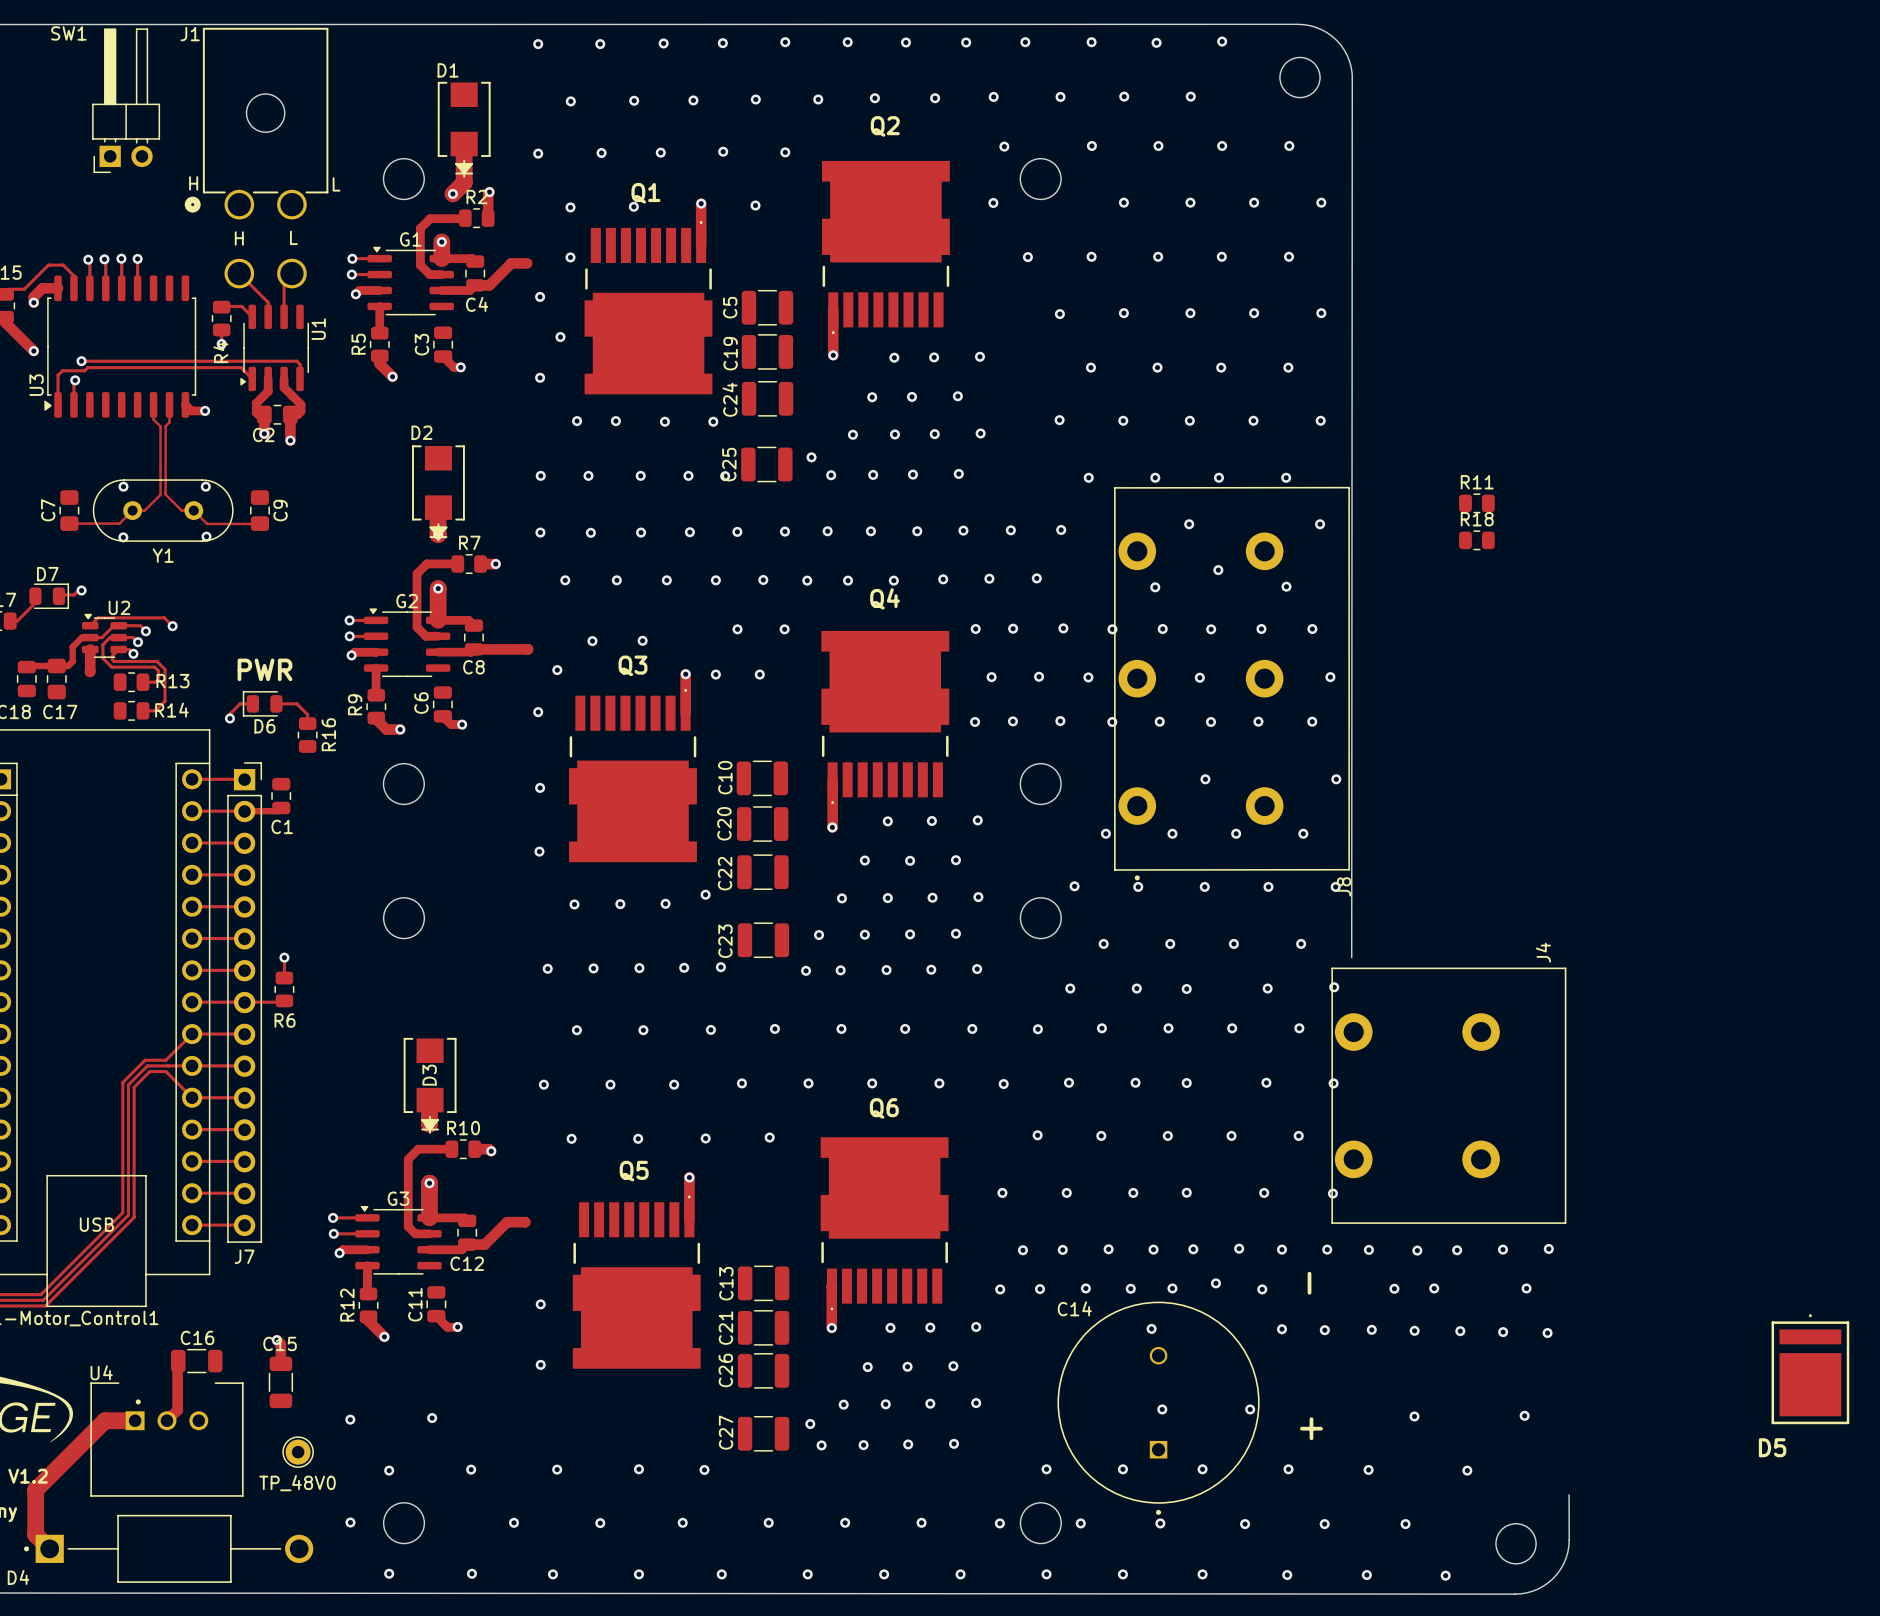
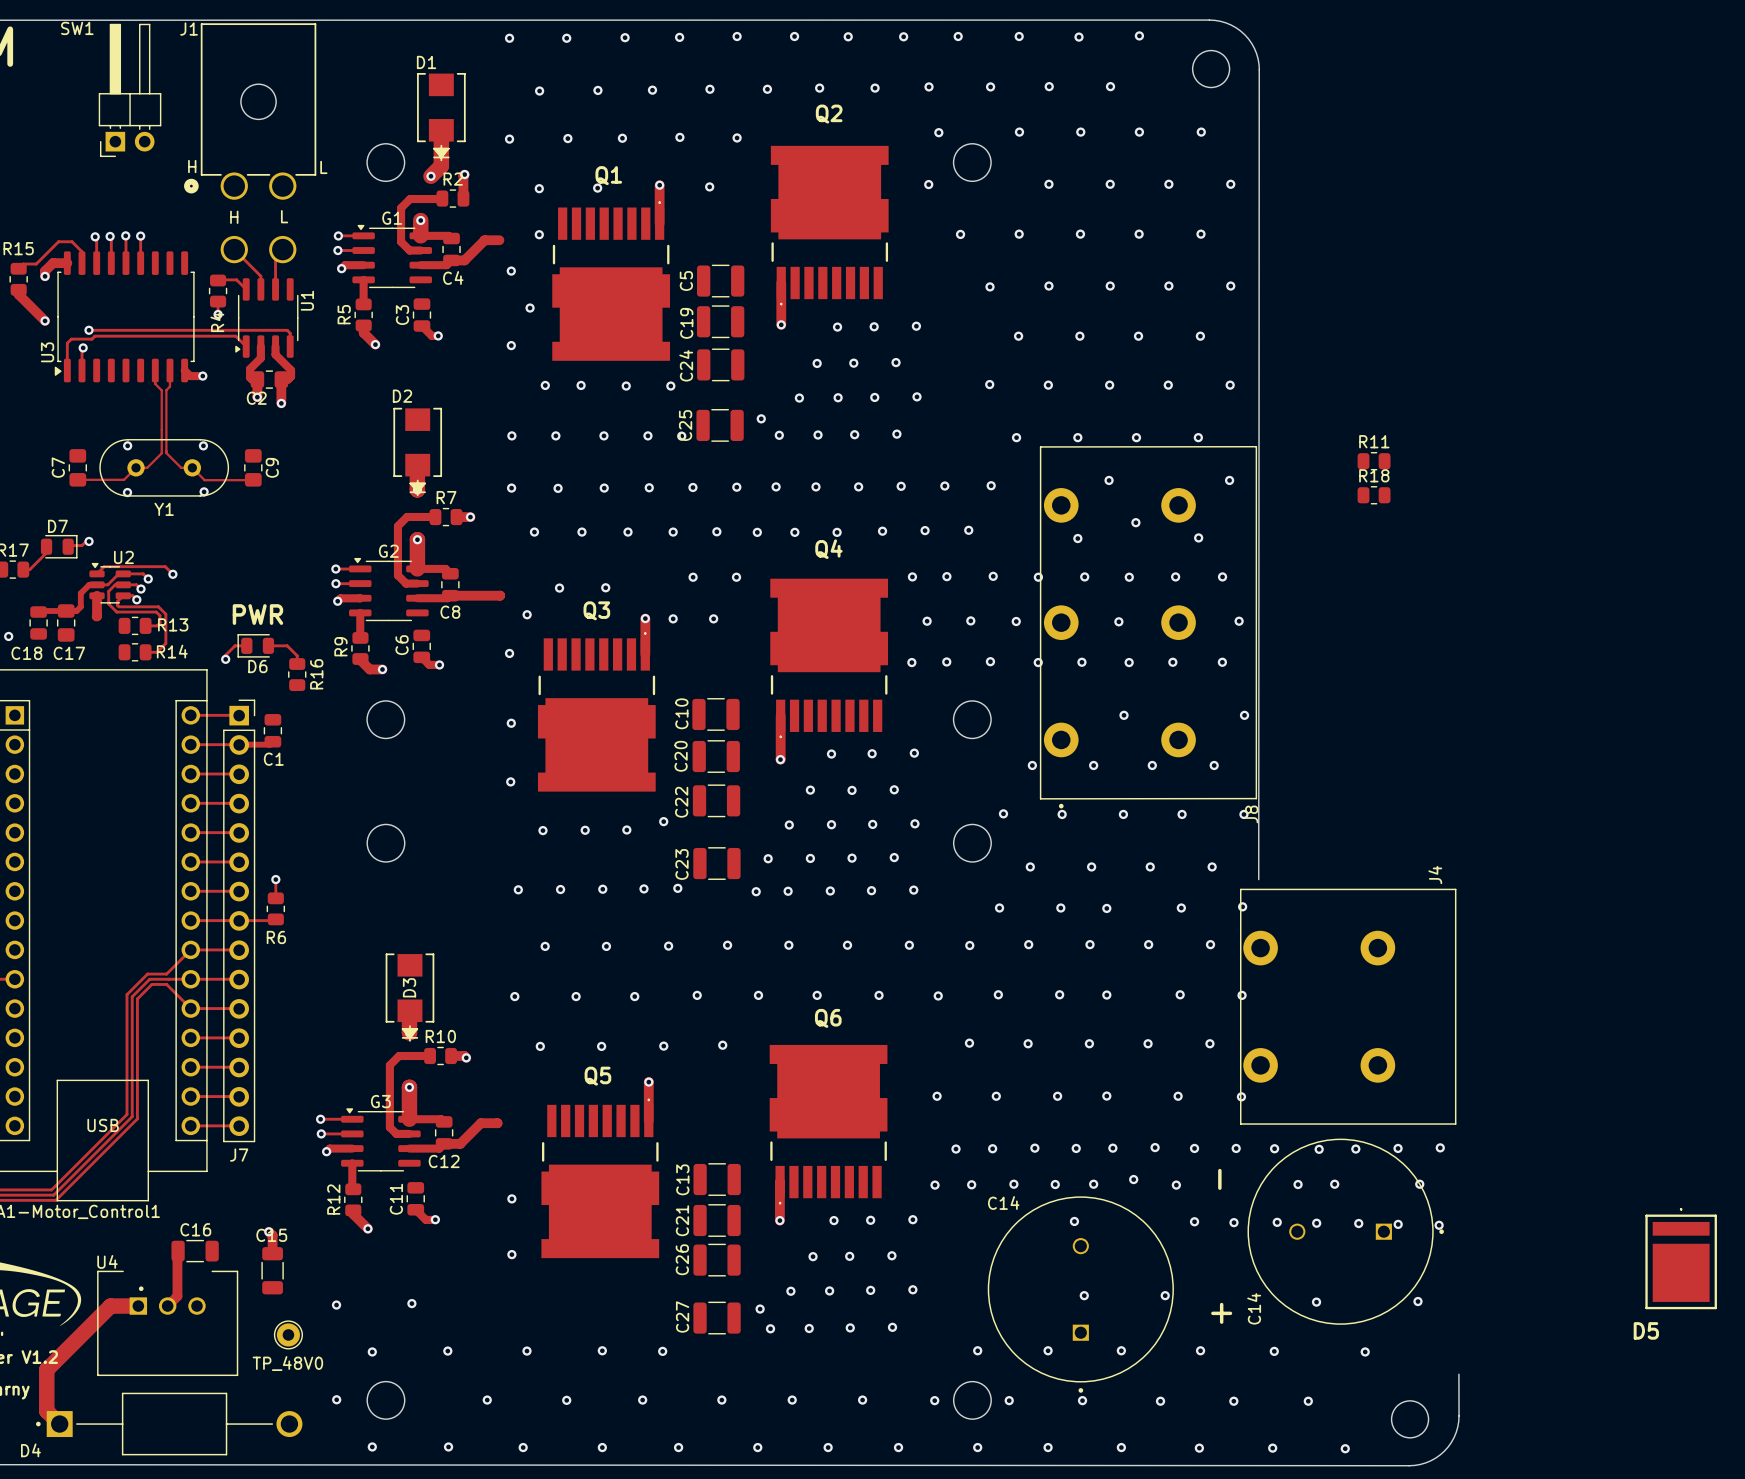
C14: none -> (1345, 1231)

